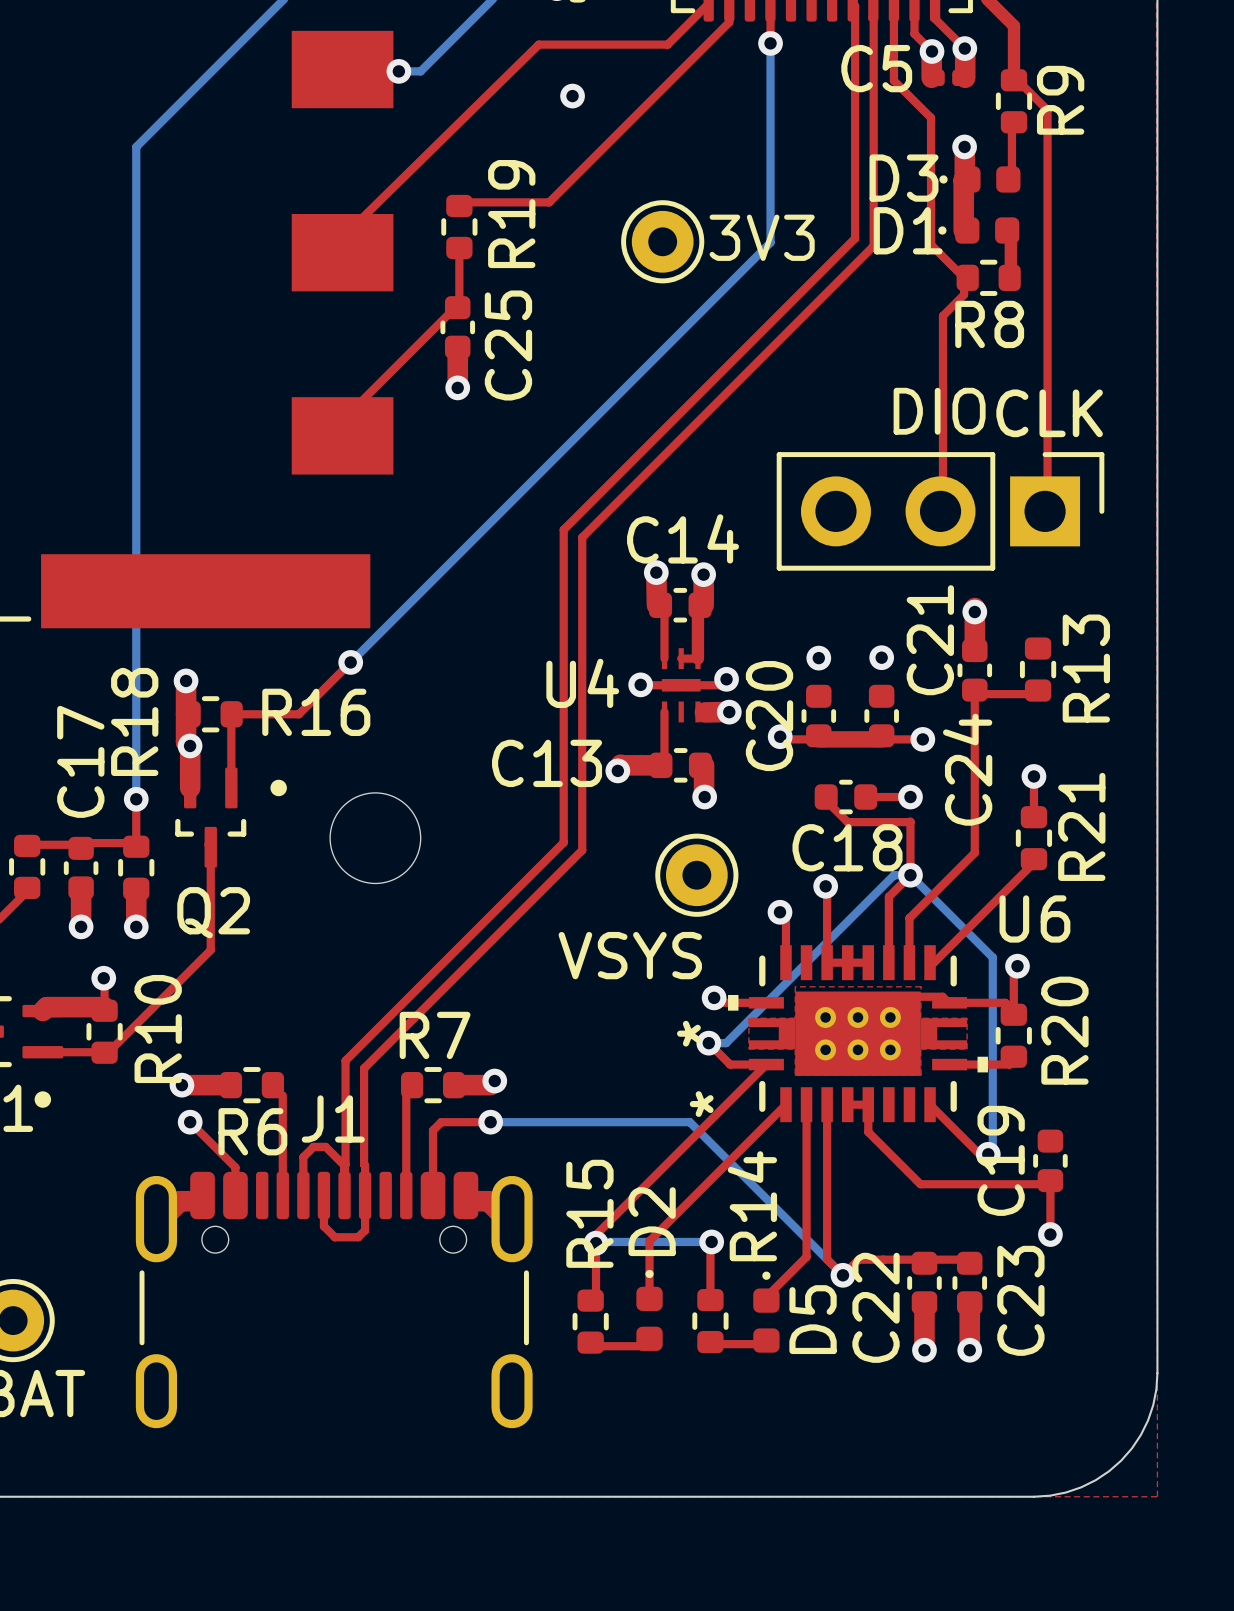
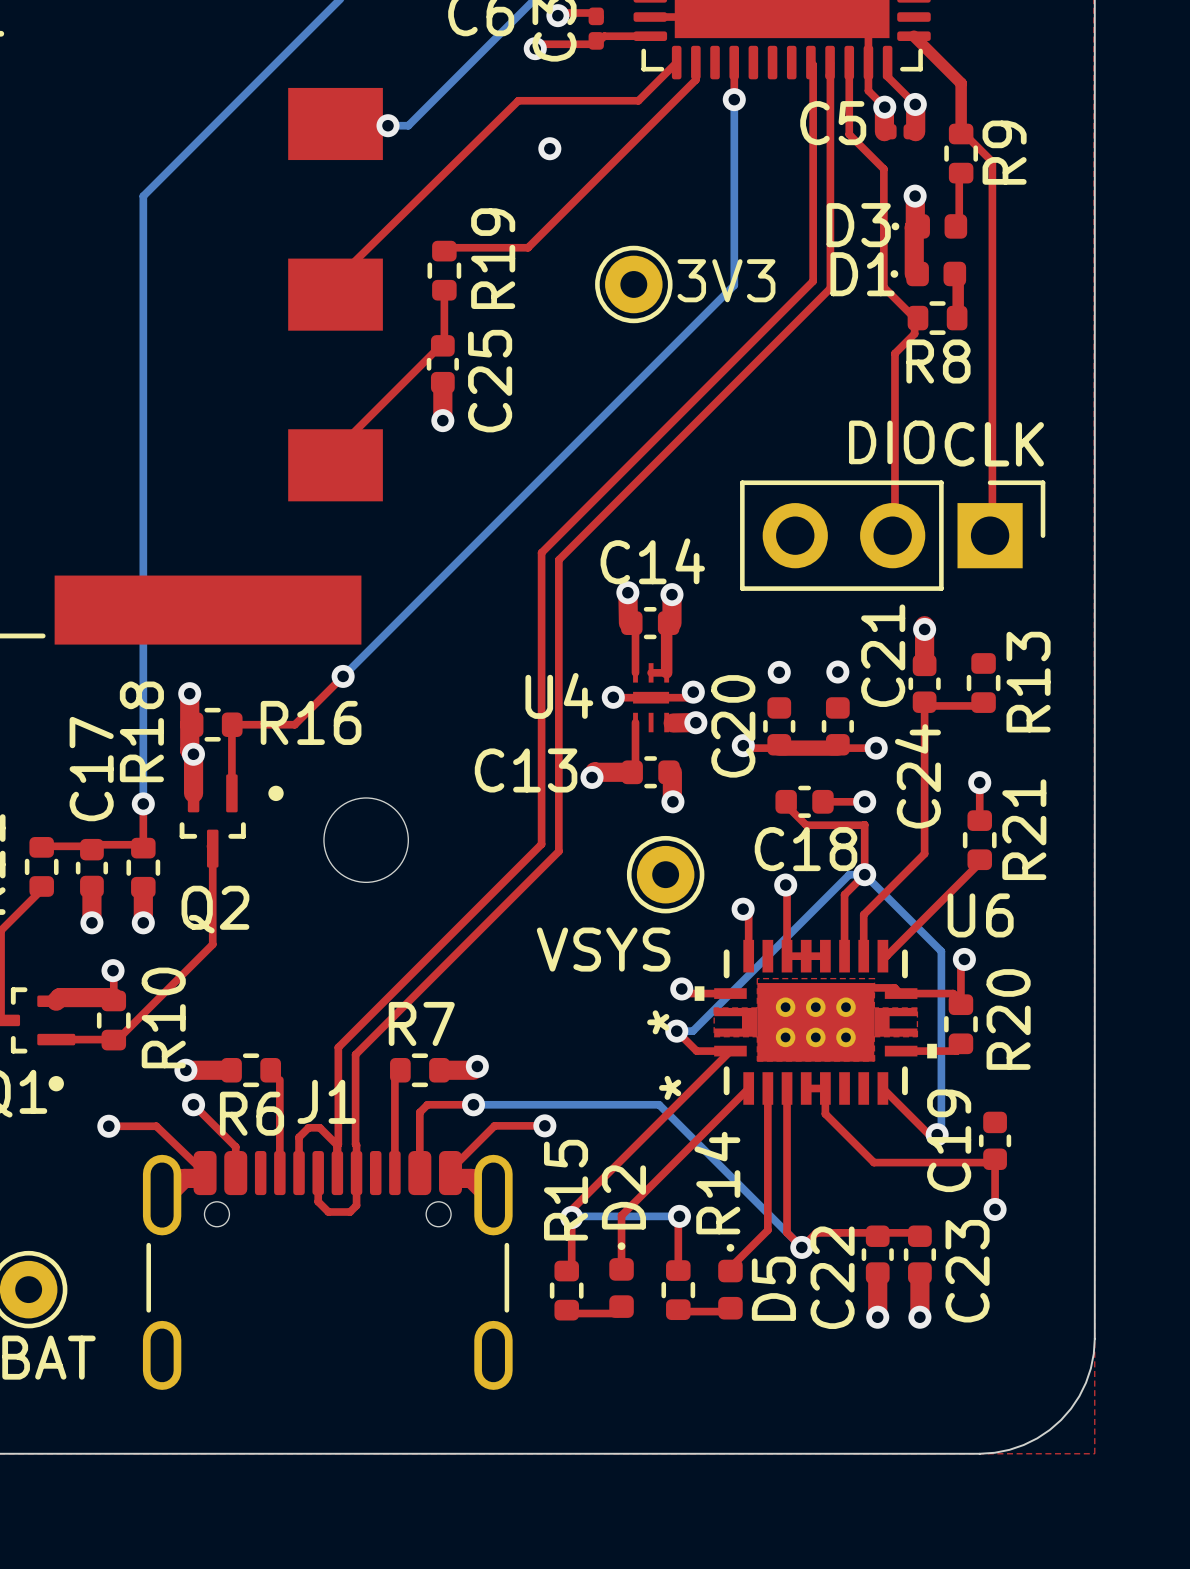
top track: none -> (544, 1125) (494, 1125) (450, 1169) (450, 1173)
via: none -> (544, 1125)
top track: none -> (108, 1126) (156, 1126) (205, 1173)
via: none -> (108, 1126)

